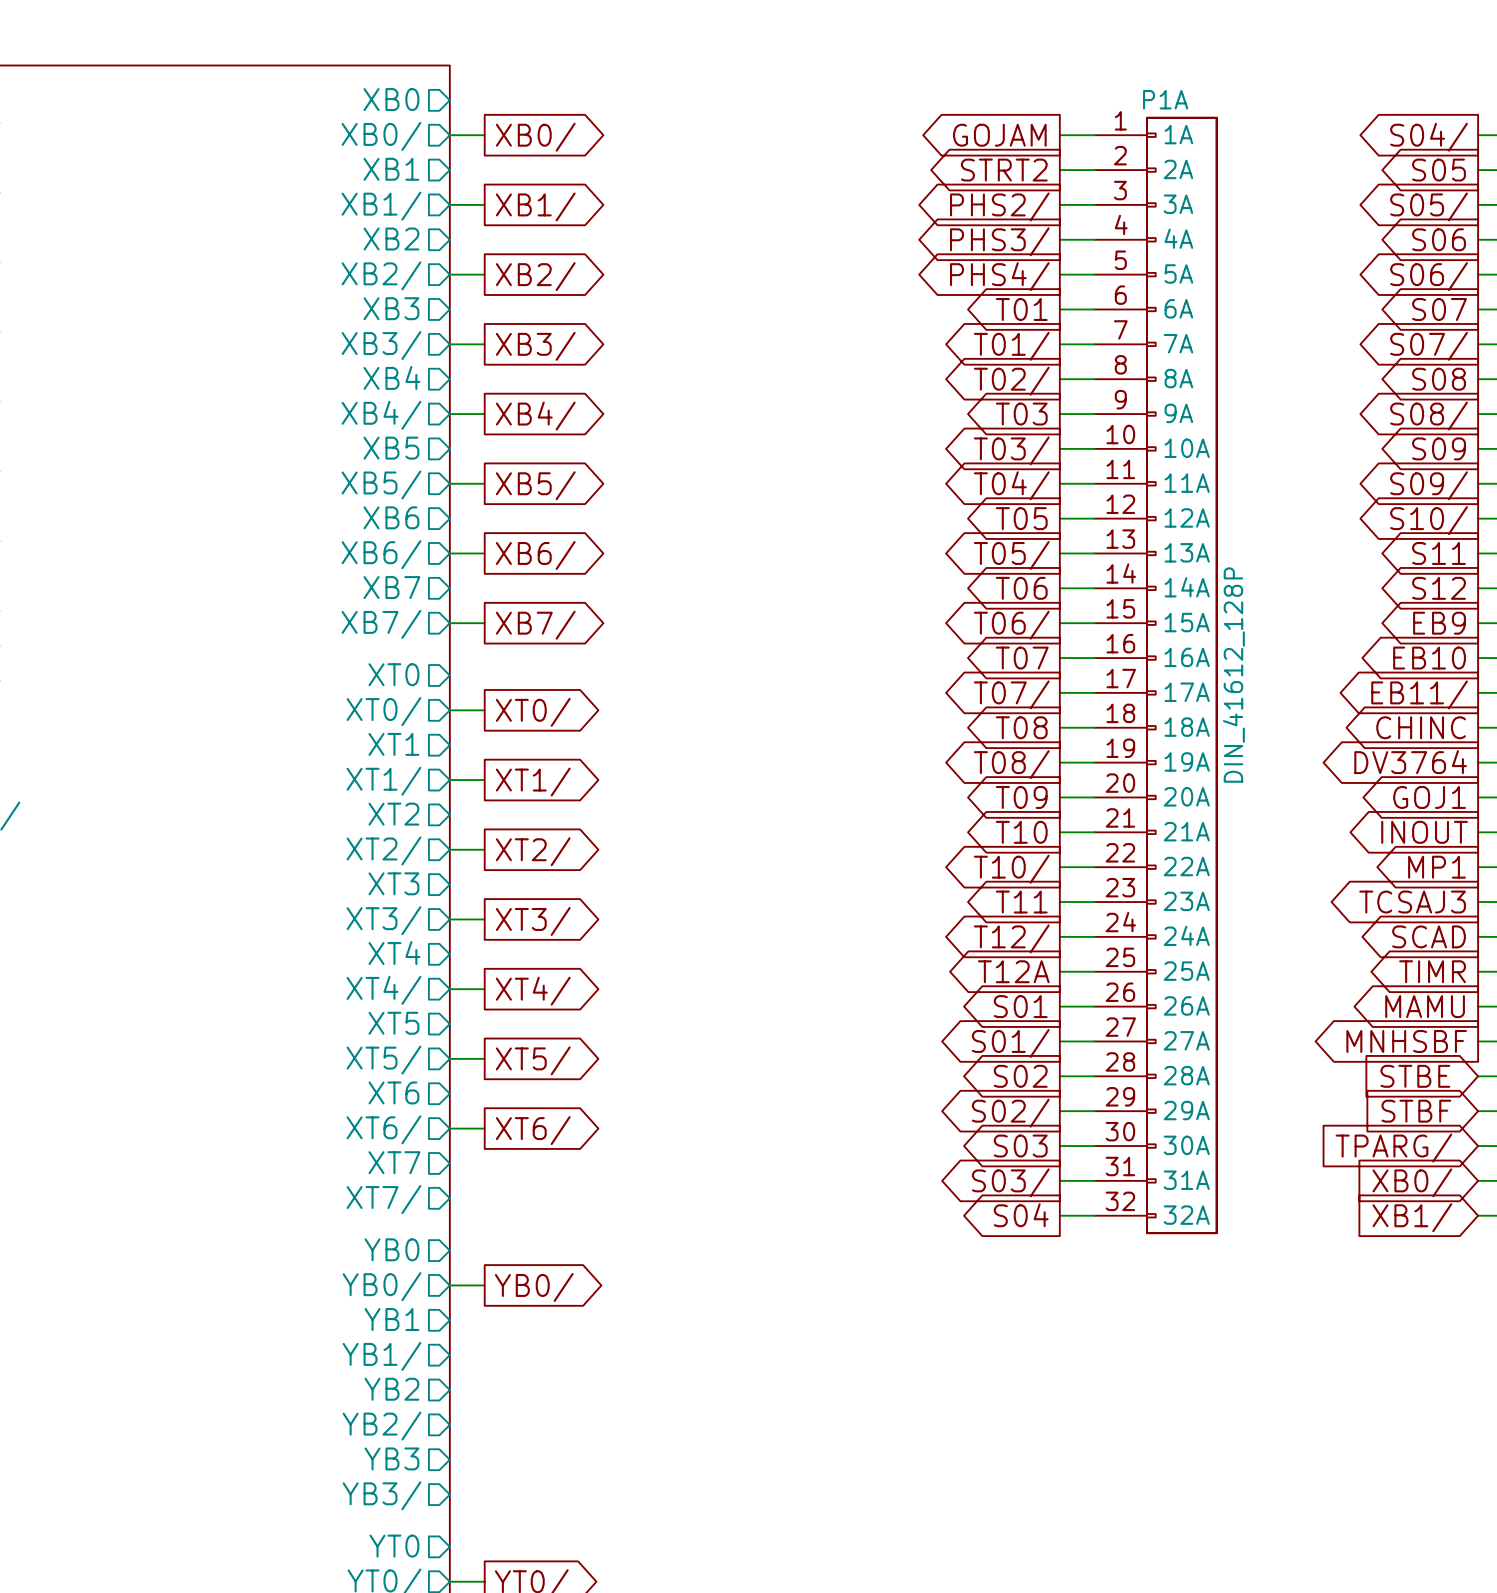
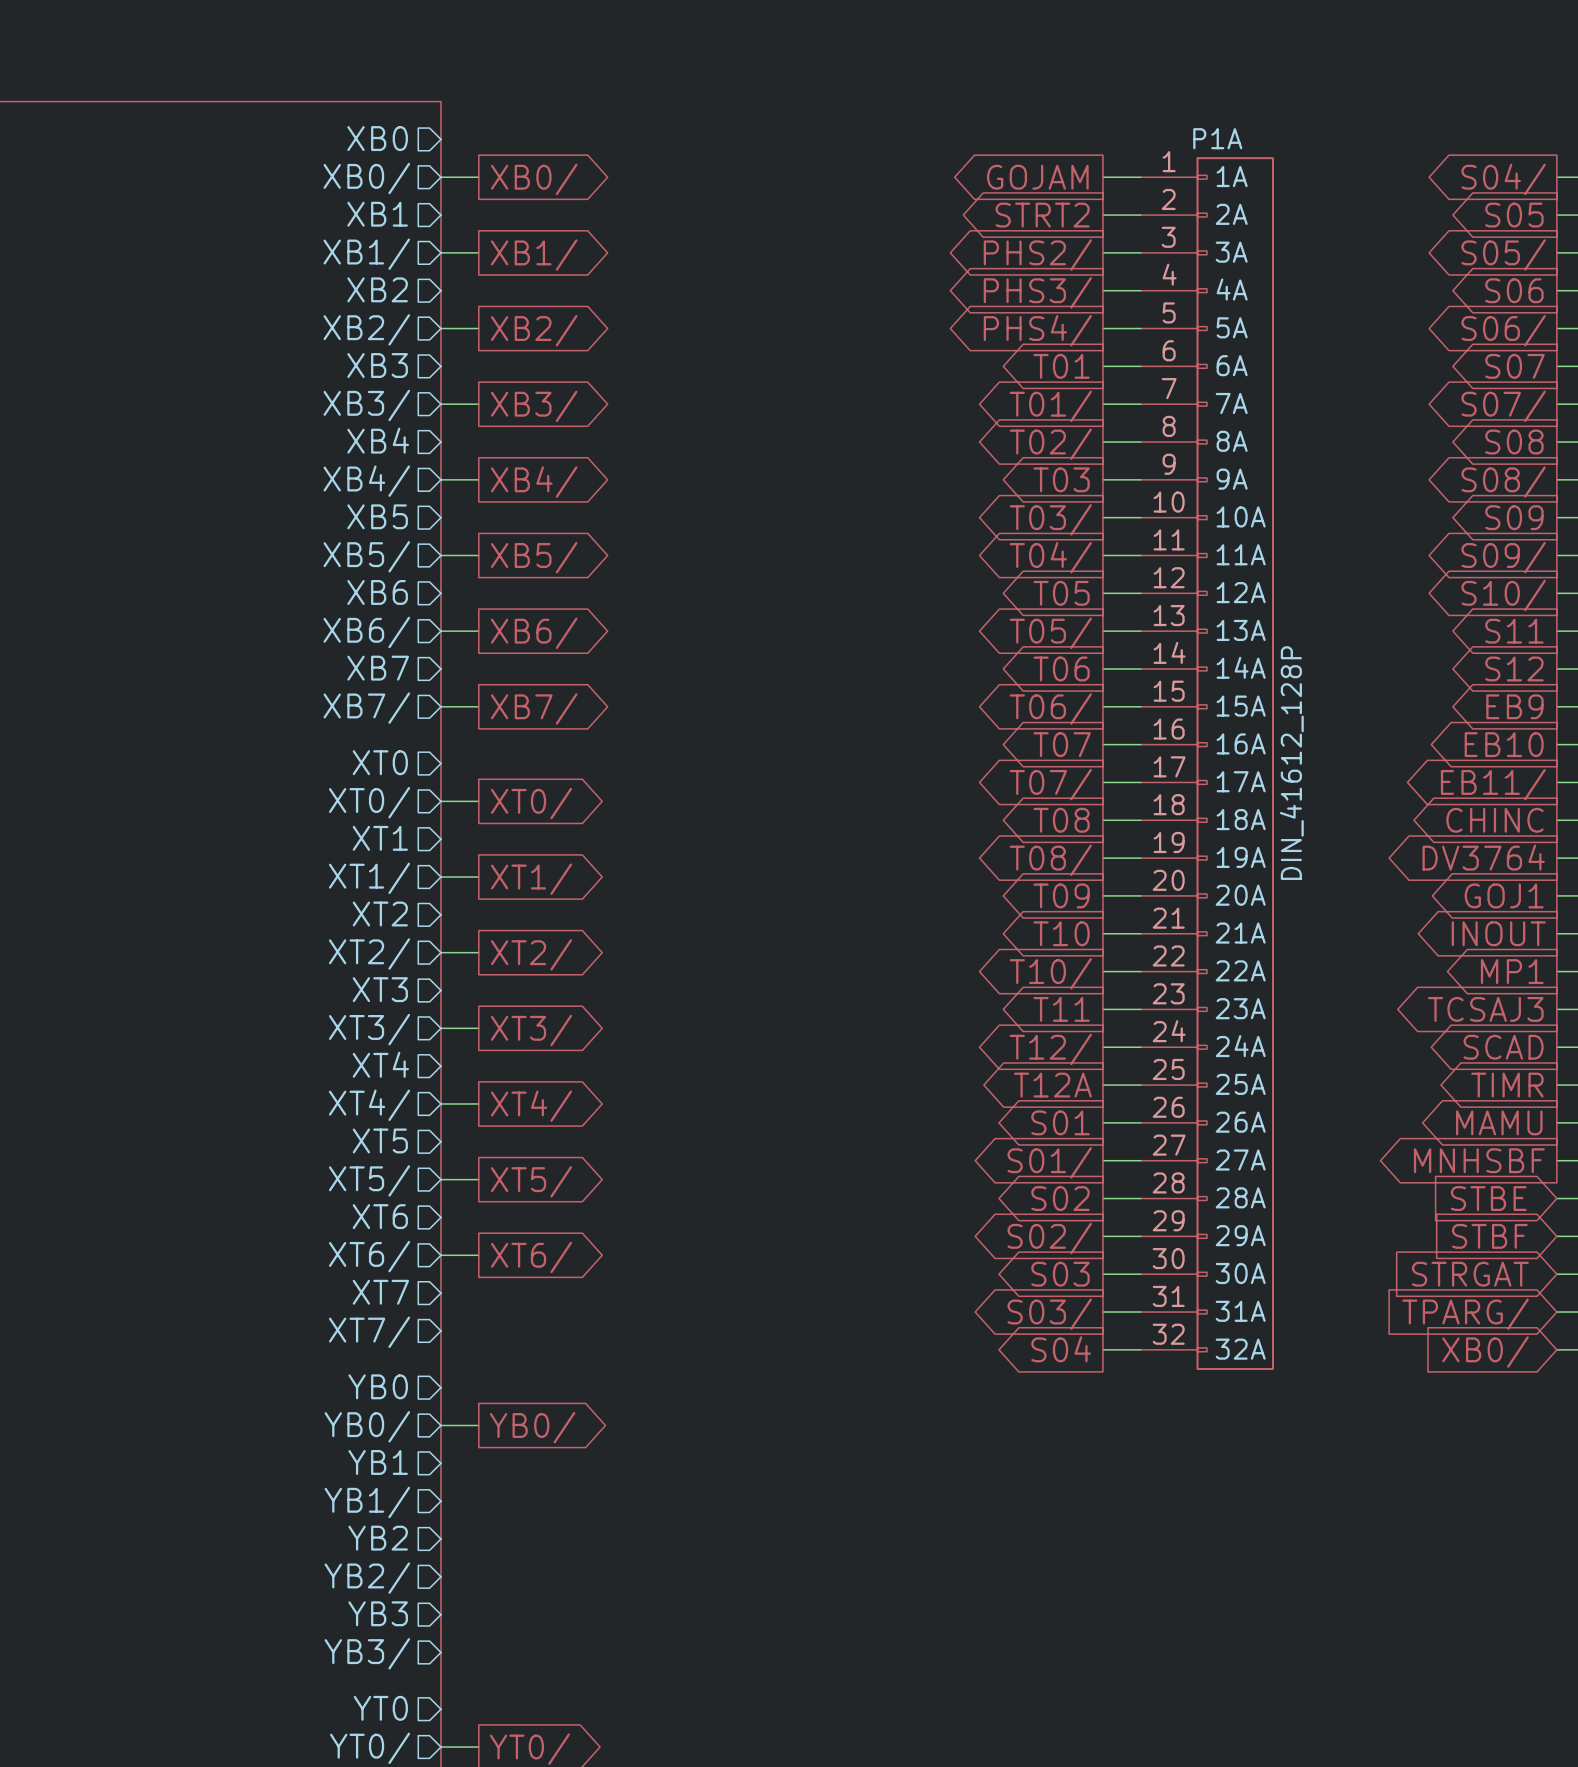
global label: TPARG/ (1393, 1148) -> STRGAT (1470, 1274)
global label: XB0/ (1412, 1182) -> TPARG/ (1465, 1314)
global label: XB1/ (1412, 1217) -> XB0/ (1485, 1352)

